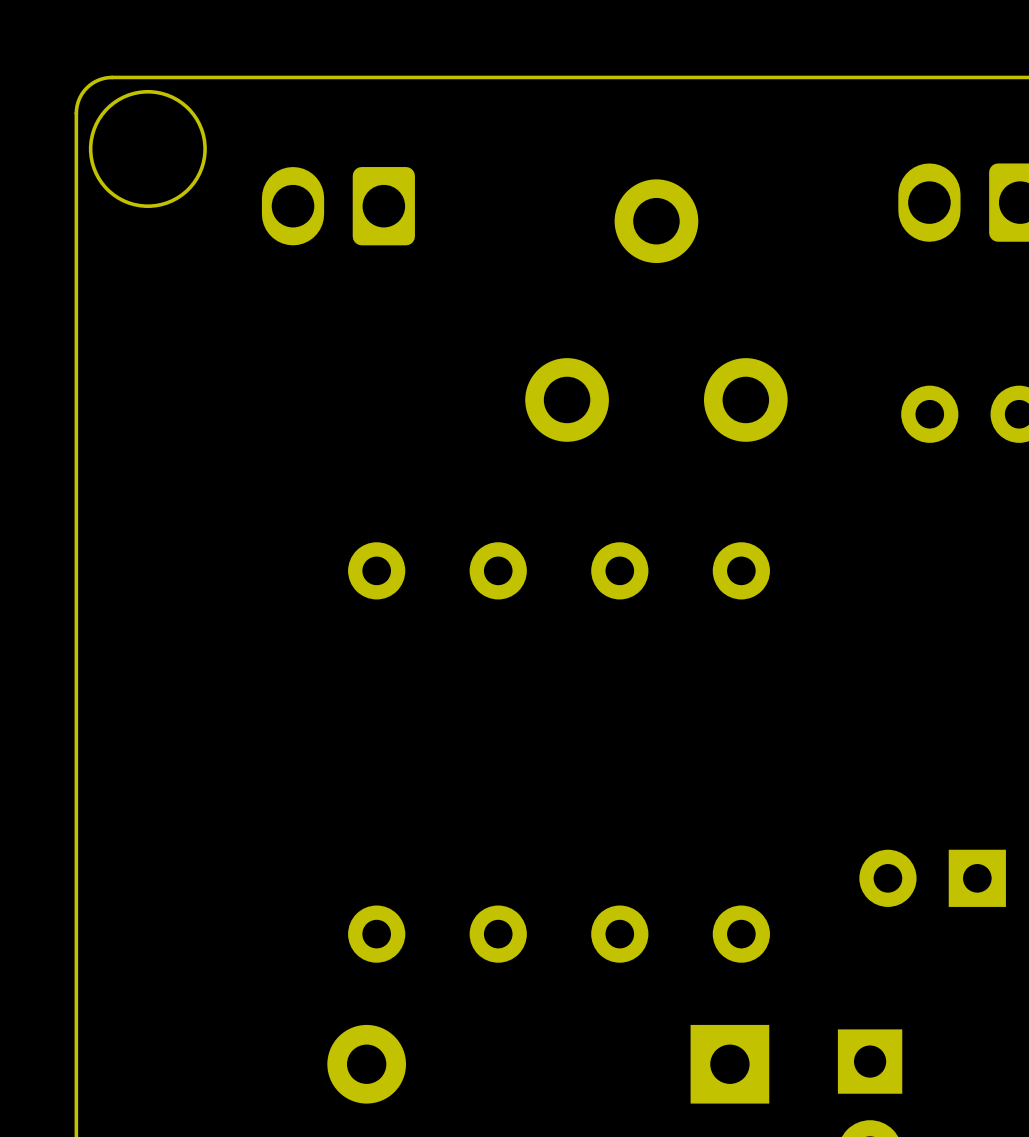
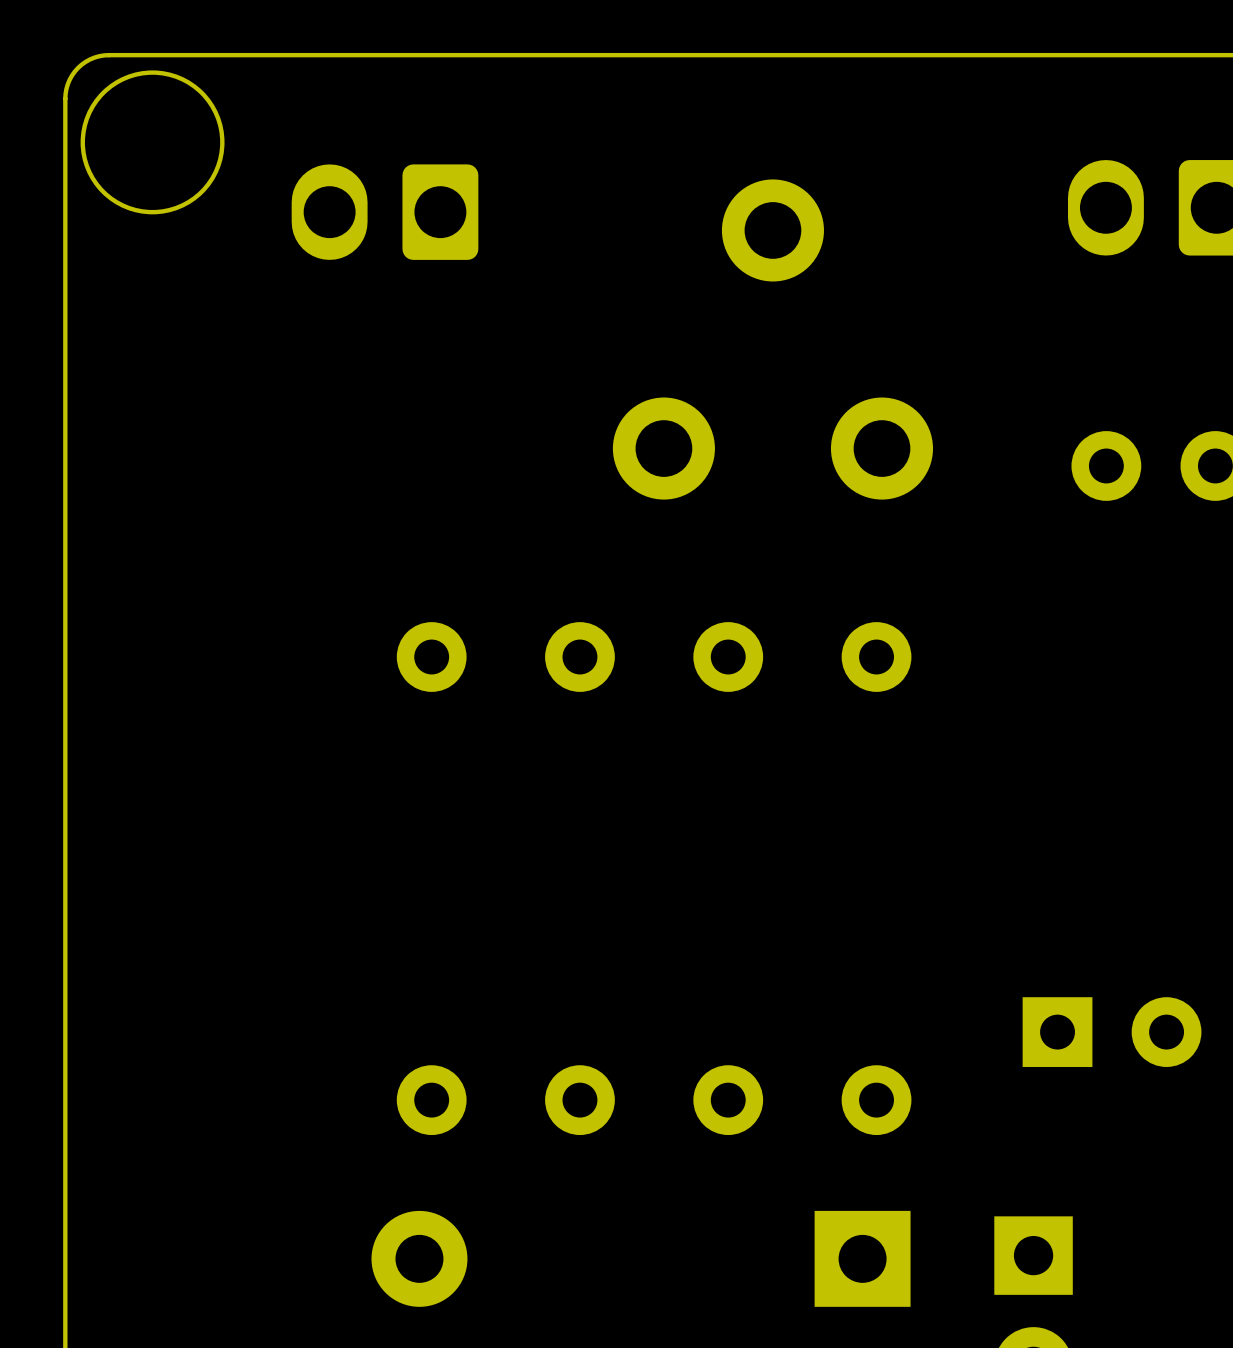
part rotation: 0° (932, 878) -> 180° (1112, 1032)

